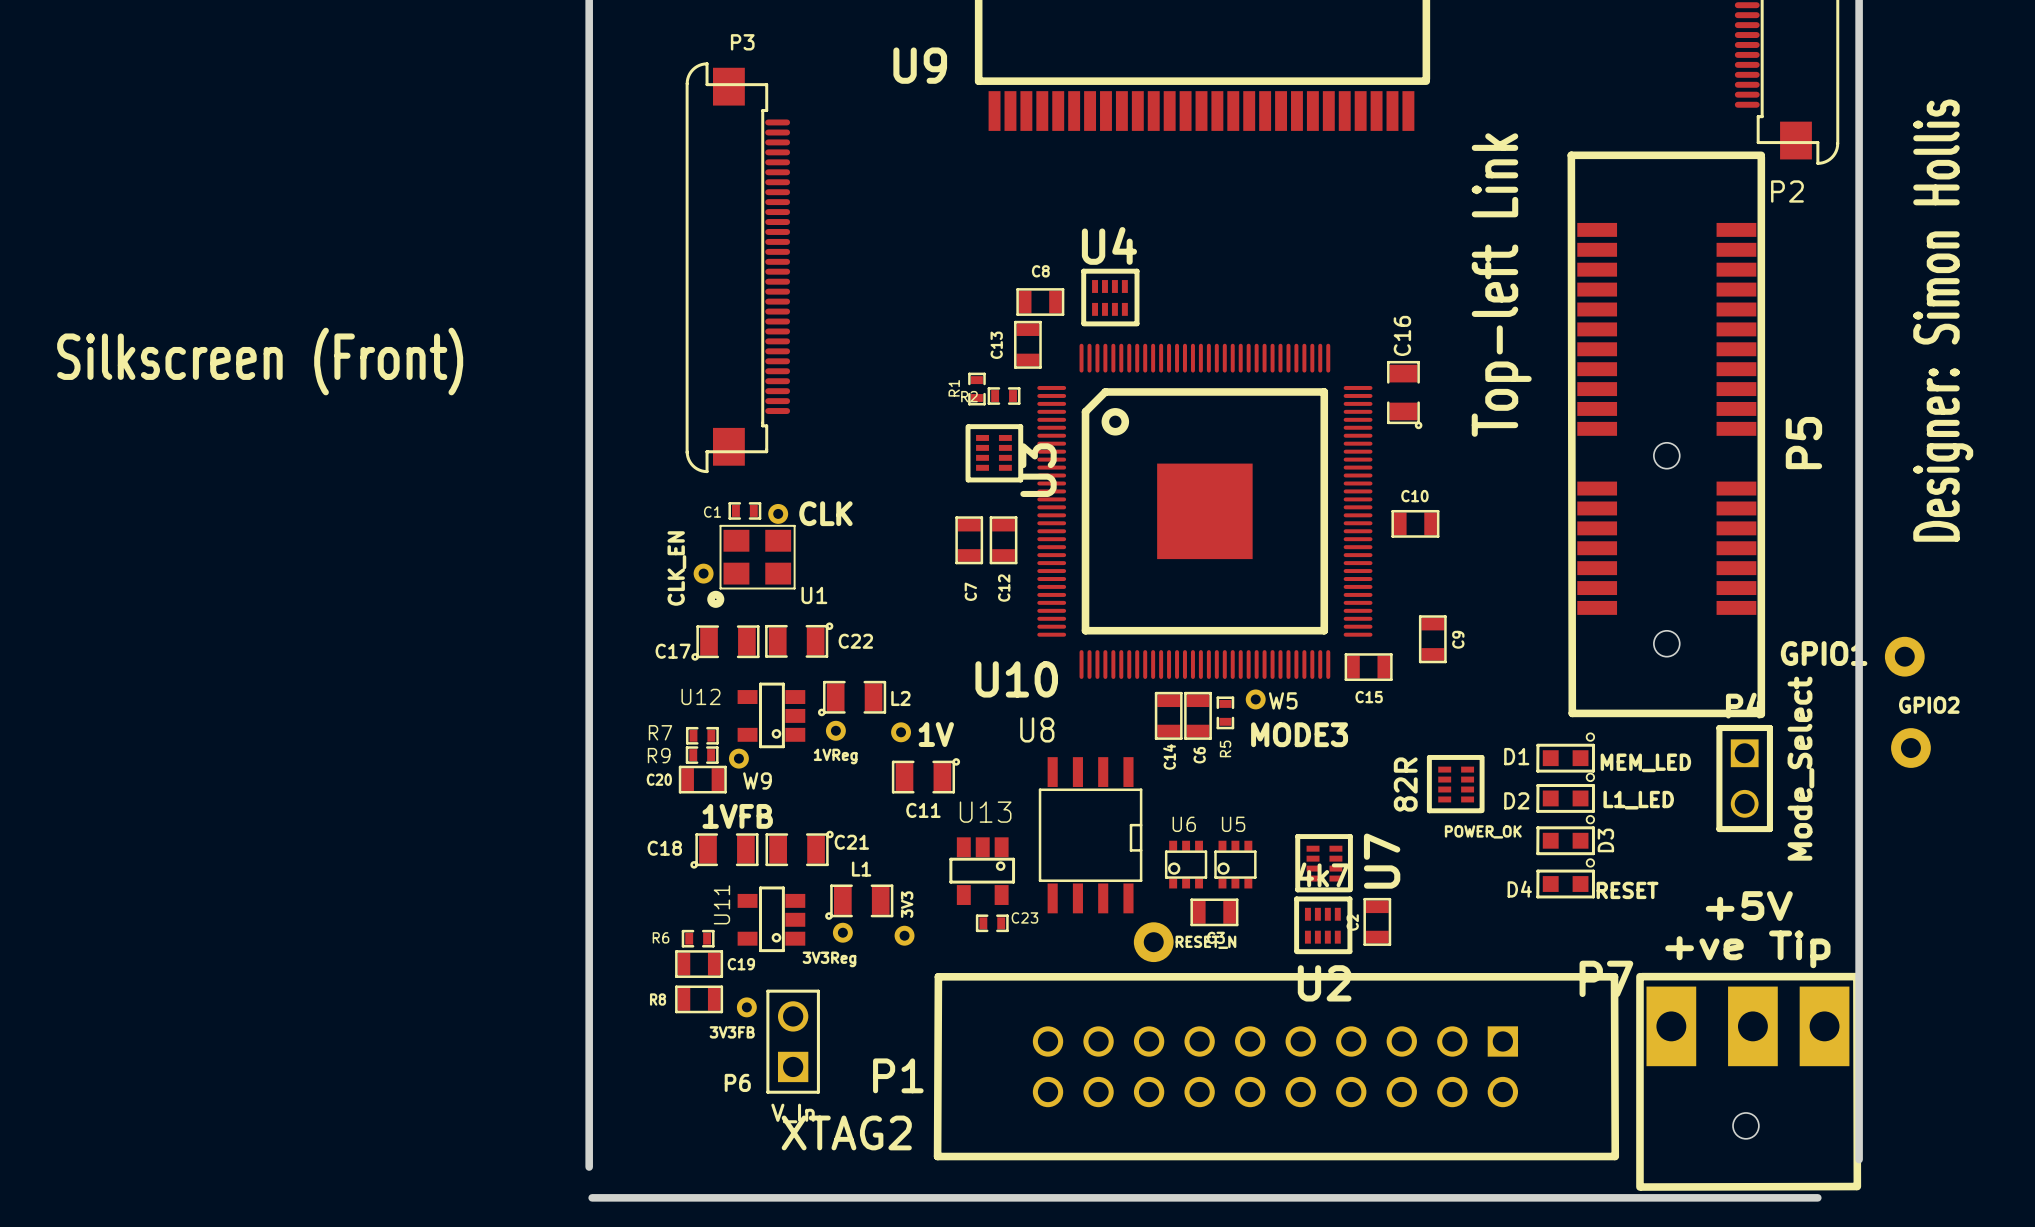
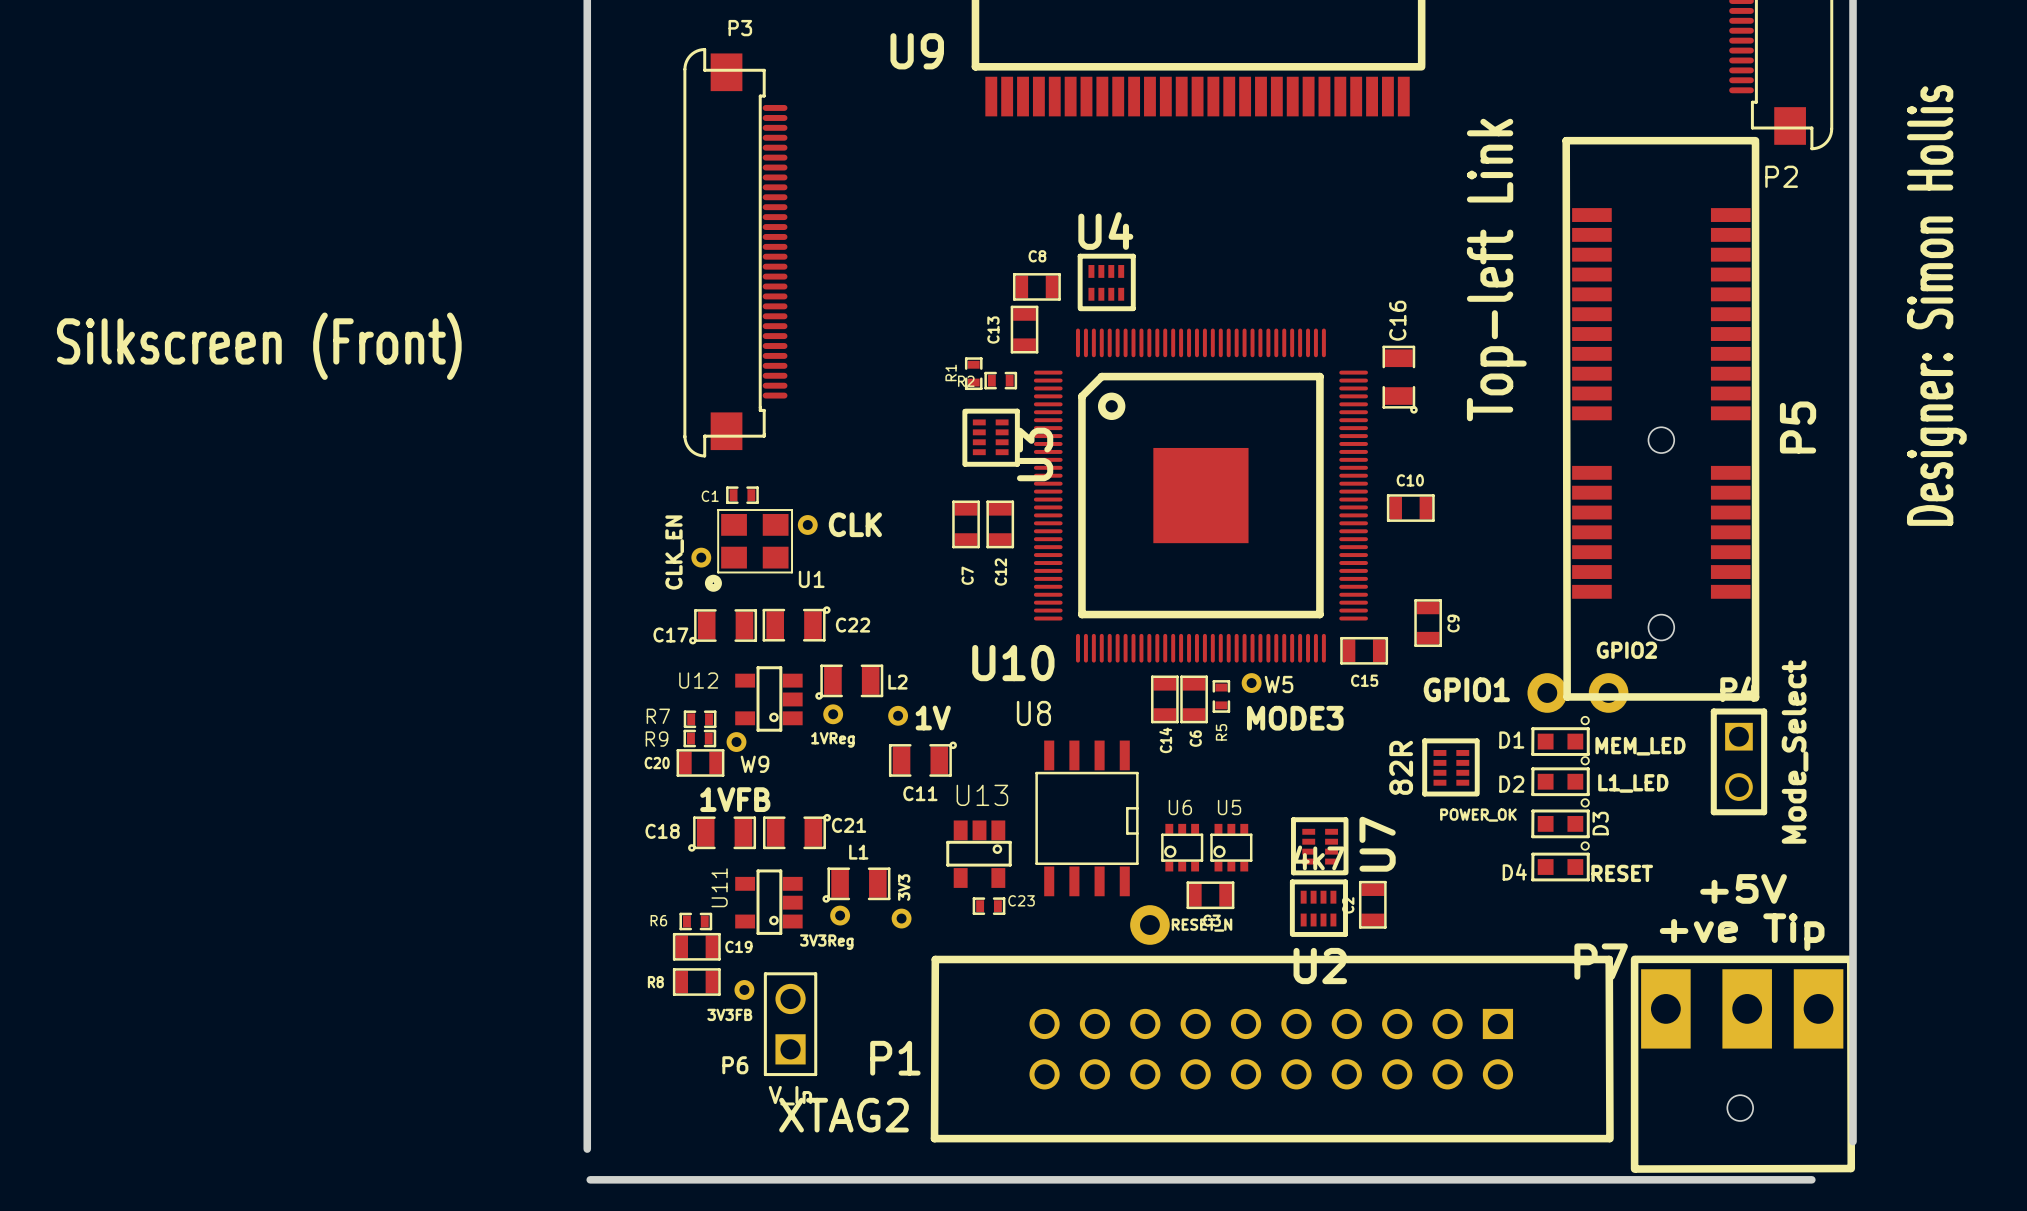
part position: (778, 513) -> (807, 524)
part position: (1904, 656) -> (1547, 692)
part position: (1910, 748) -> (1608, 692)

